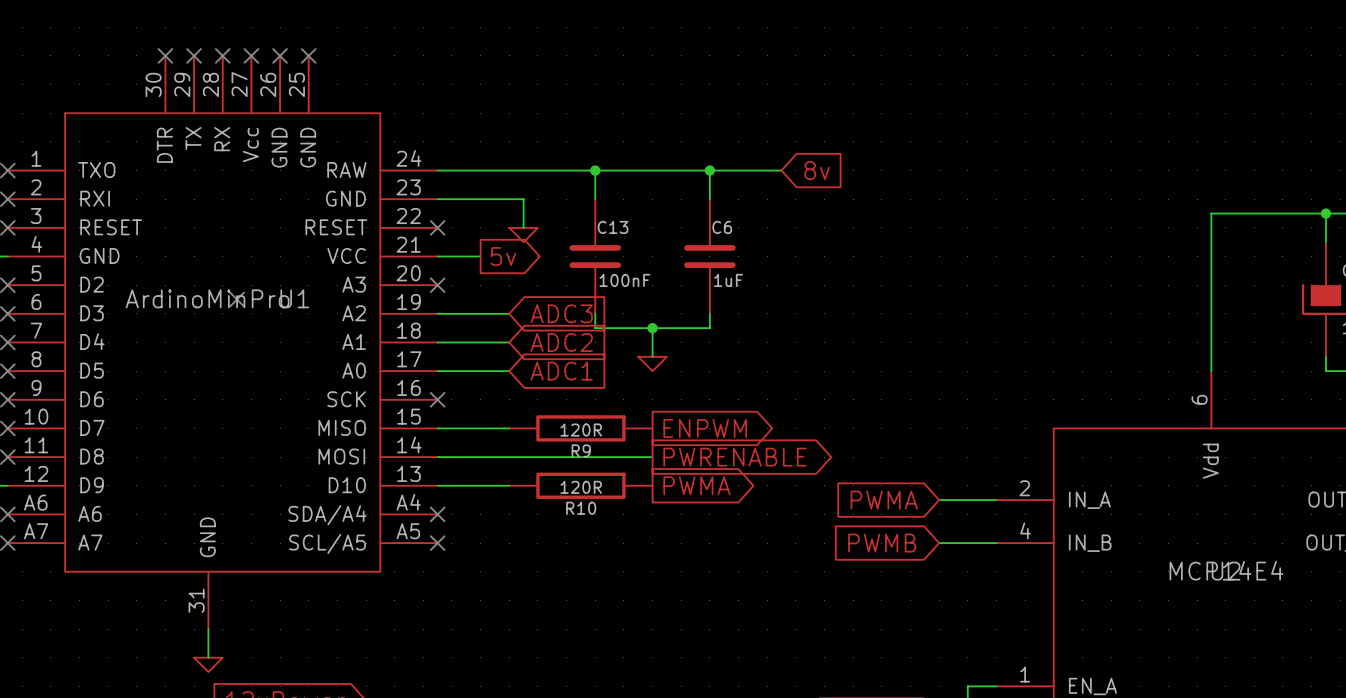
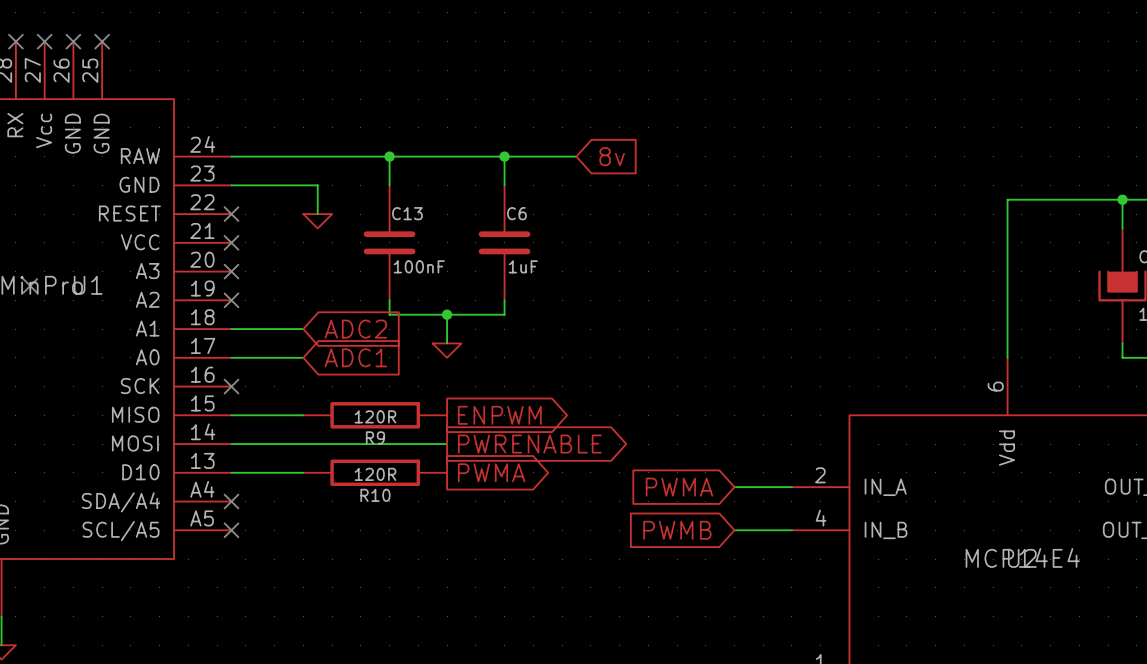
wire: (437, 256) (480, 256) -> none
no-connect mark: none -> (231, 242)
global label: 5v (503, 256) -> none
wire: (437, 313) (509, 313) -> none
no-connect mark: none -> (231, 300)
global label: ADC3 (561, 313) -> none

